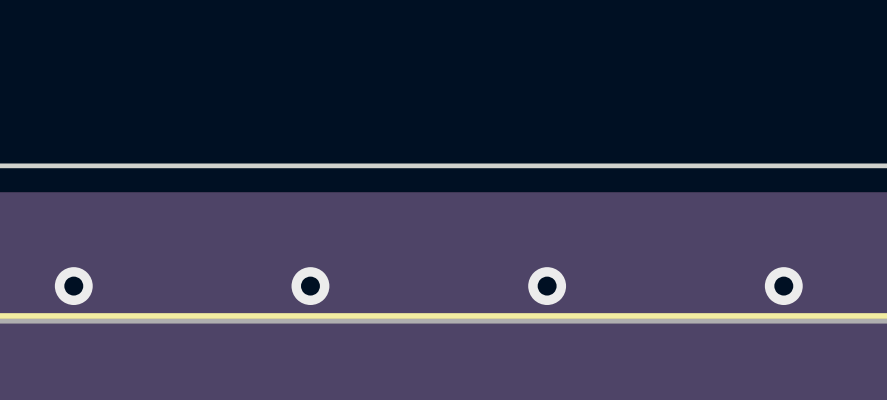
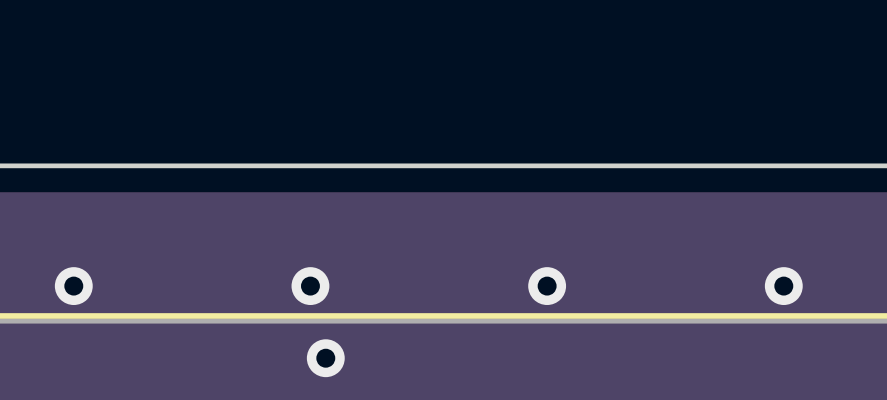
via: none -> (325, 358)

